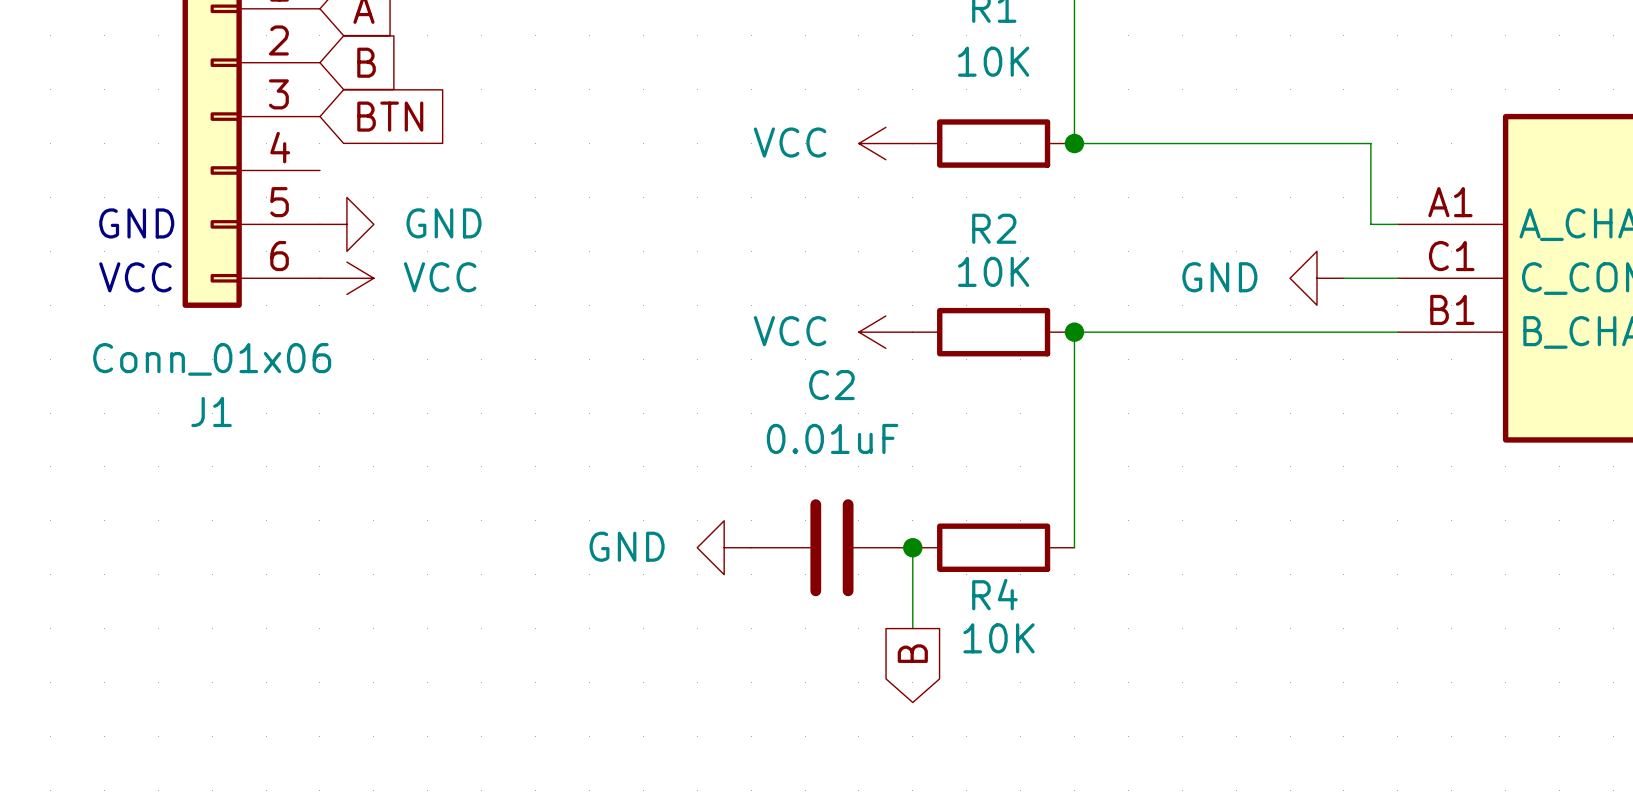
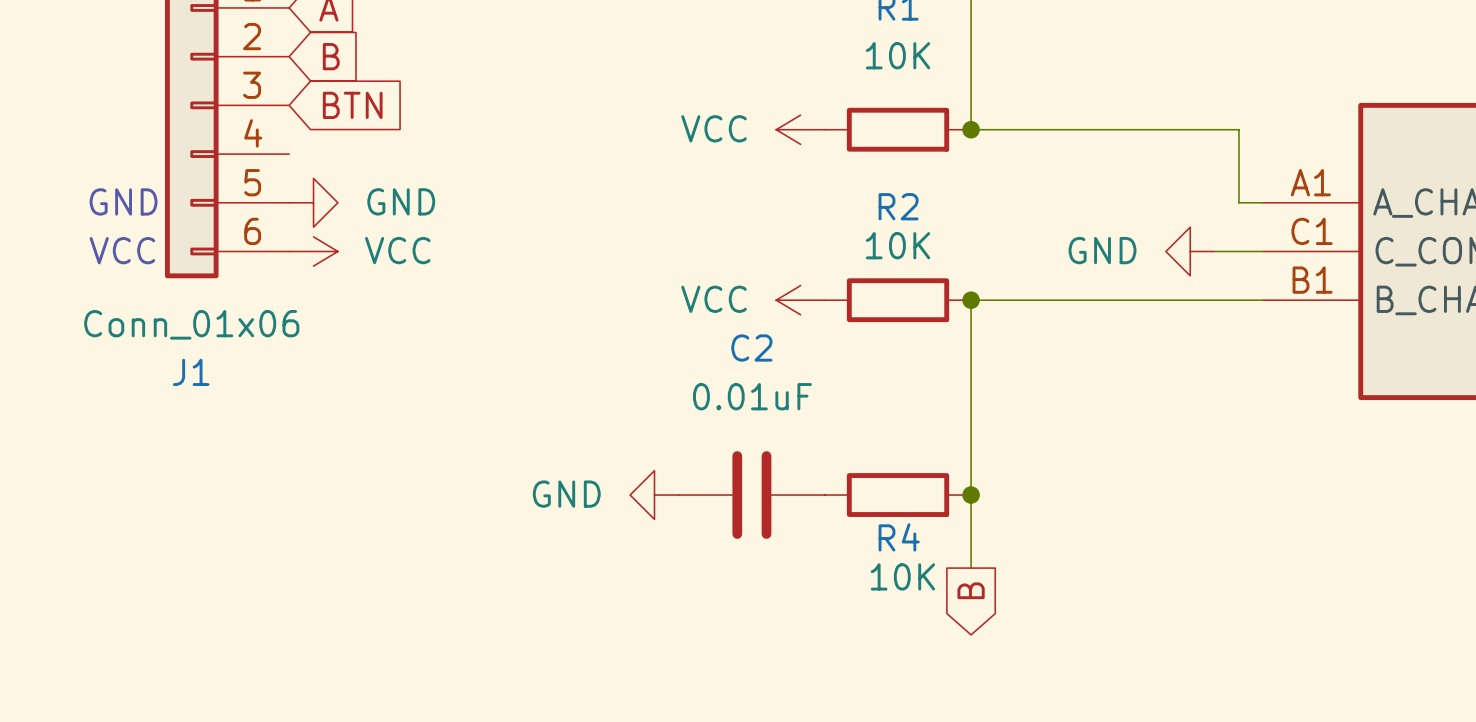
wire: (912, 547) (912, 628) -> (971, 495) (971, 568)
junction: (912, 547) -> none
junction: none -> (971, 495)
global label position: B (912, 653) -> B (971, 590)

